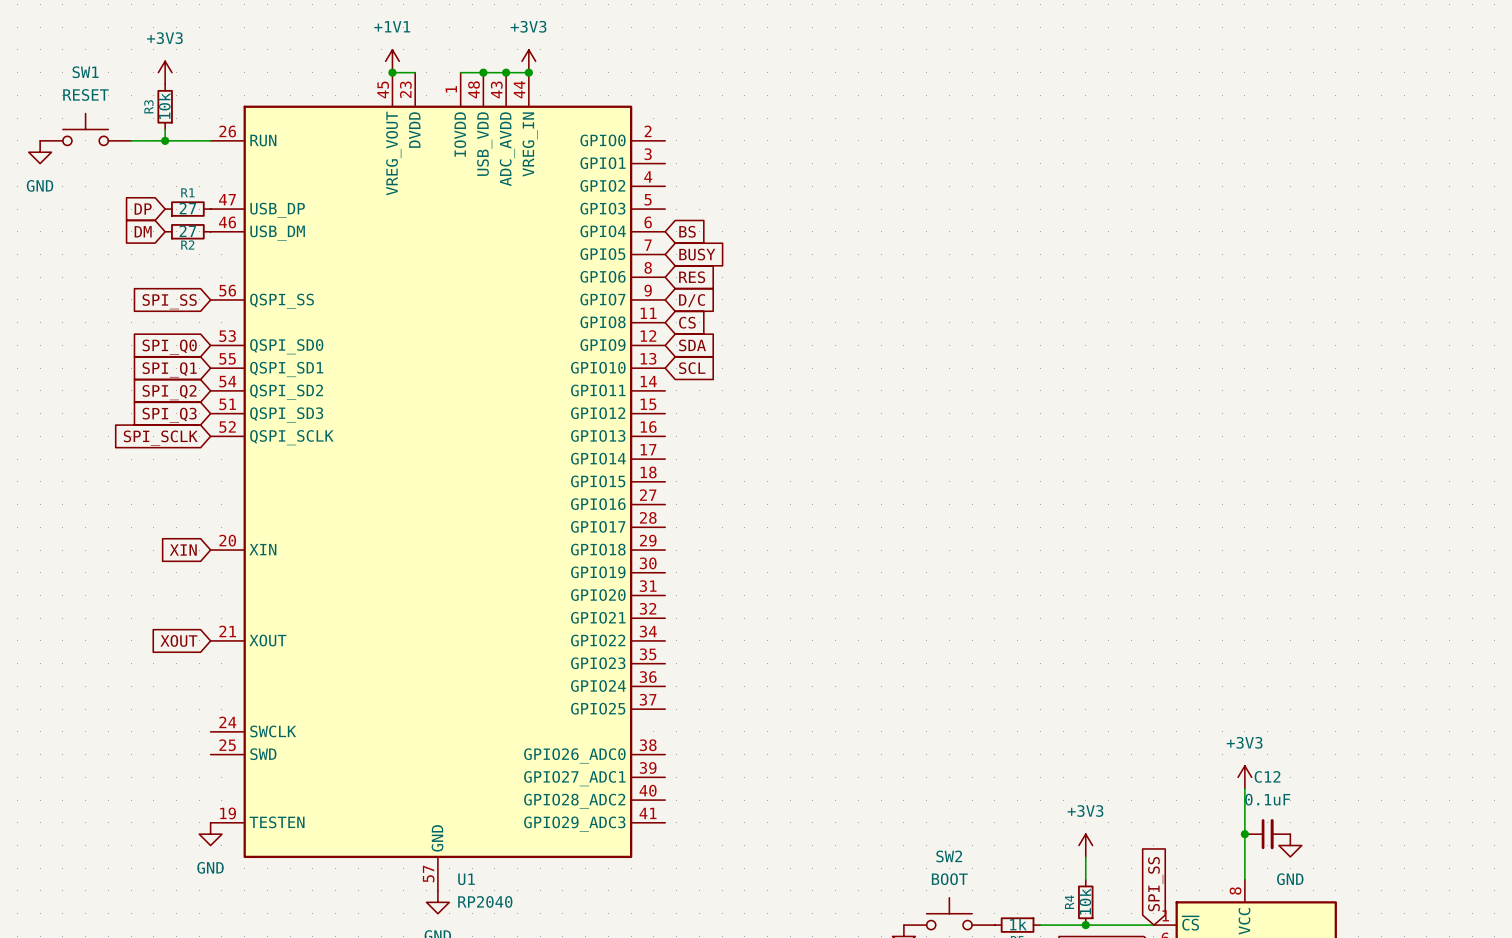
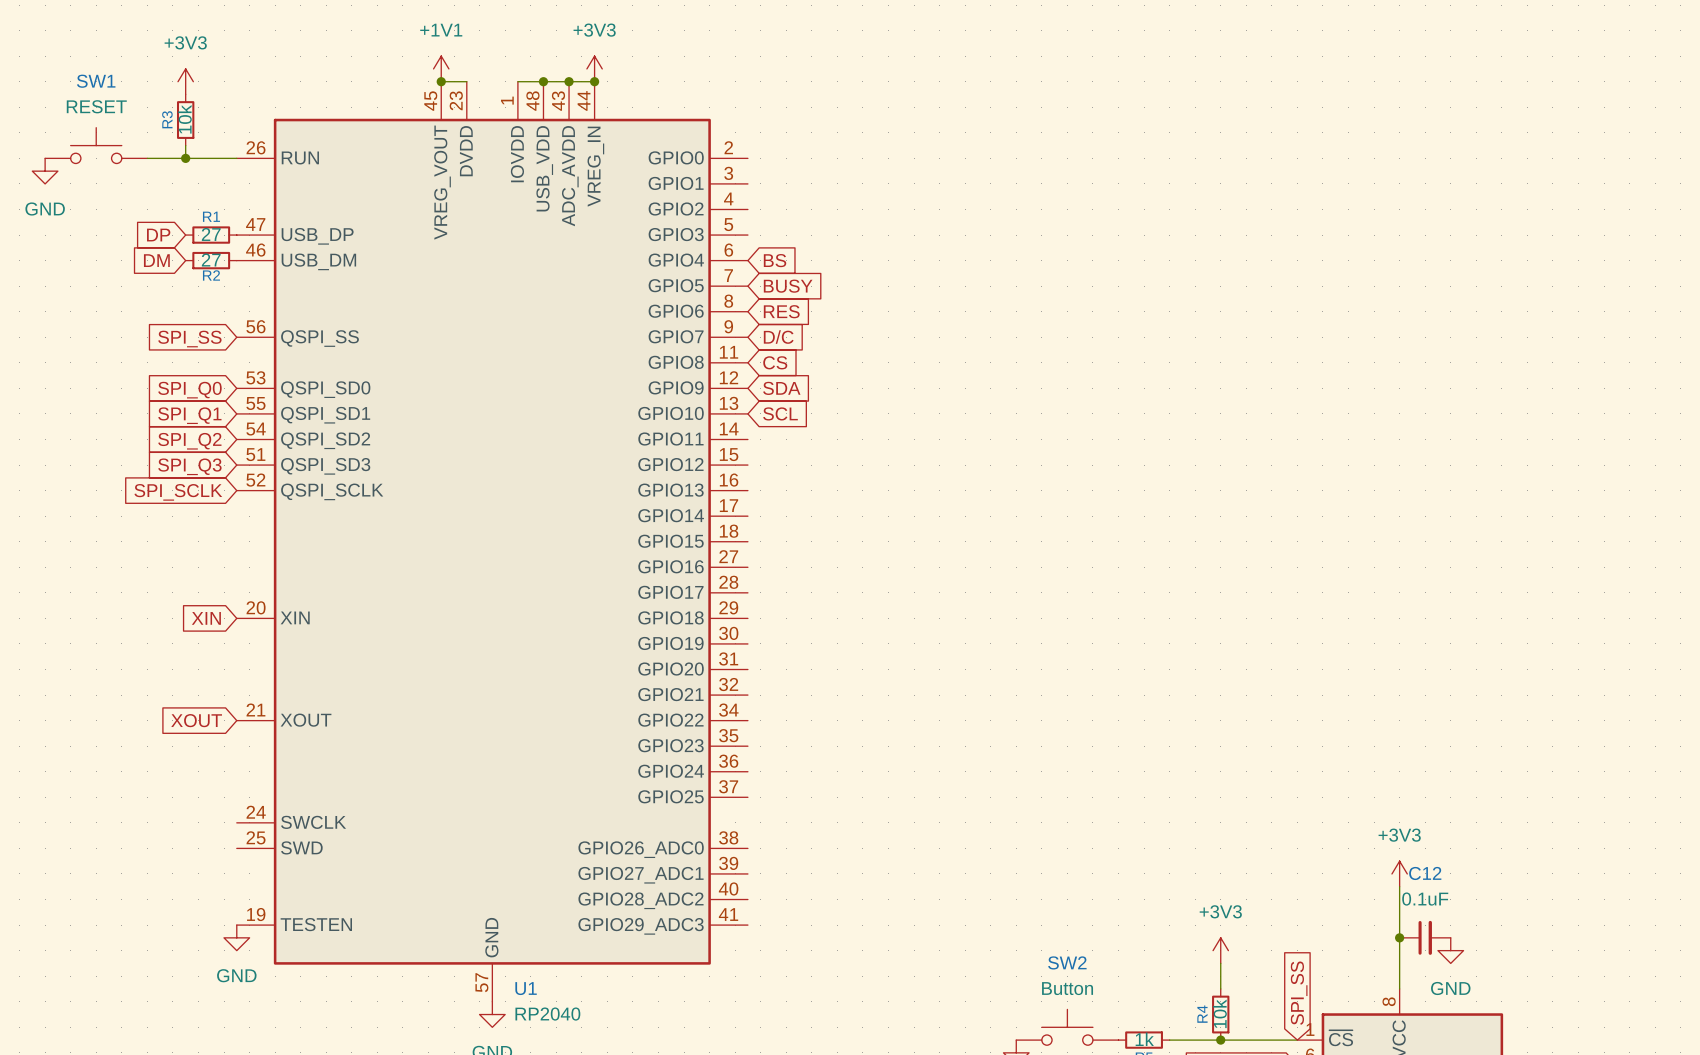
SW2 value: BOOT (949, 879) -> Button (1067, 988)

